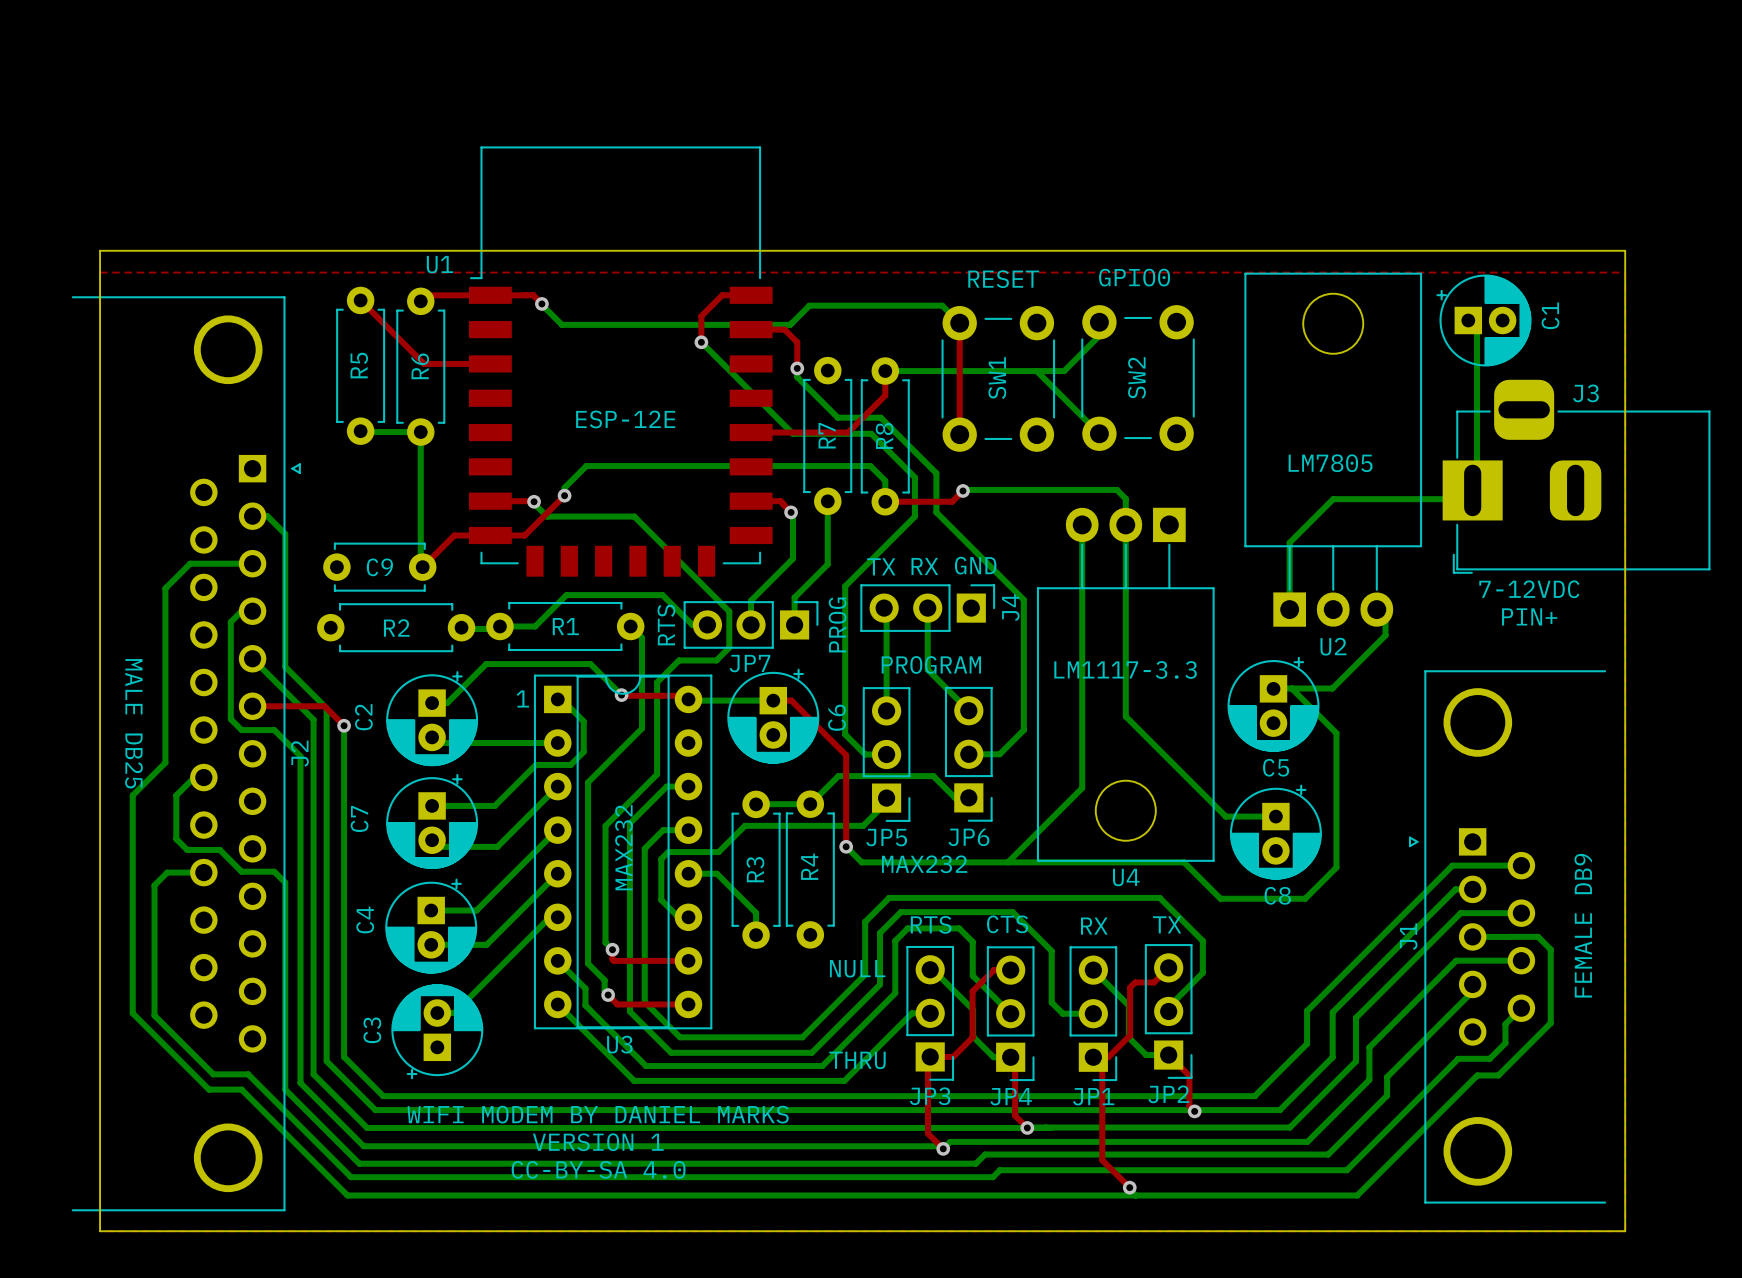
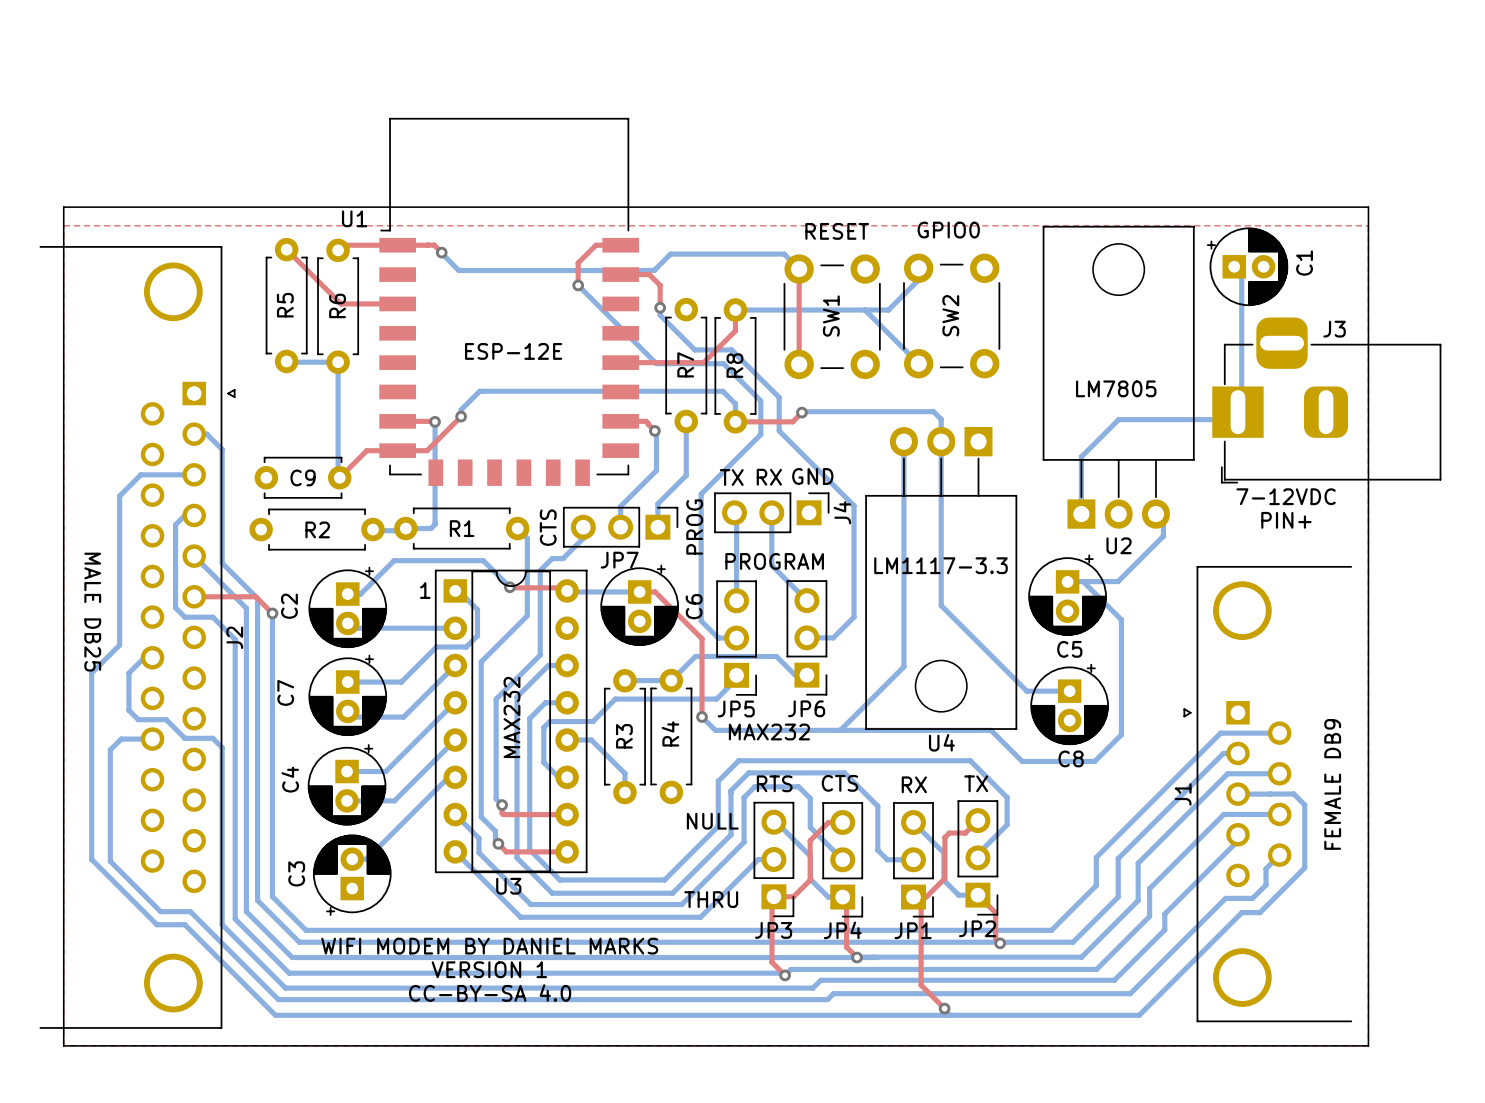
bottom track: (534, 501) (547, 516) (634, 516) (729, 611) (729, 647) (716, 660) (679, 660) (657, 682) -> none
bottom track: none -> (435, 426) (435, 523) (430, 528)
bottom track: (707, 624) (692, 624) (662, 595) (566, 595) (535, 626) (529, 626) -> (583, 527) (583, 538) (563, 558) (552, 558) (540, 570) (540, 576)
text: RTS (666, 625) -> CTS (548, 527)

